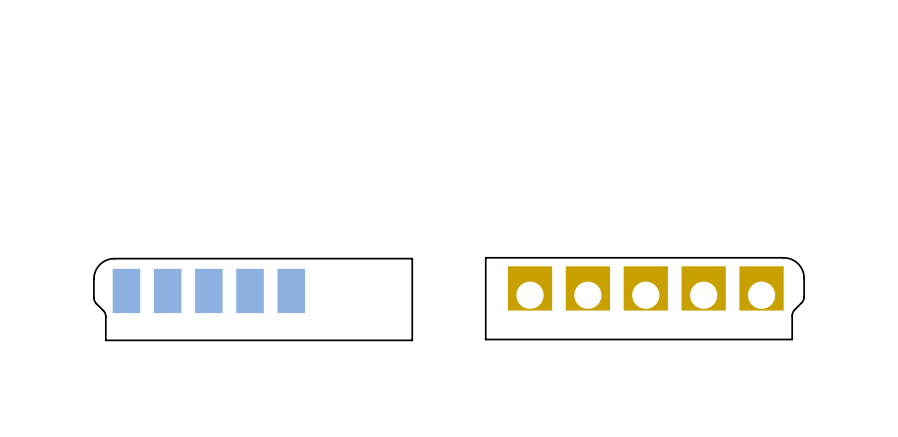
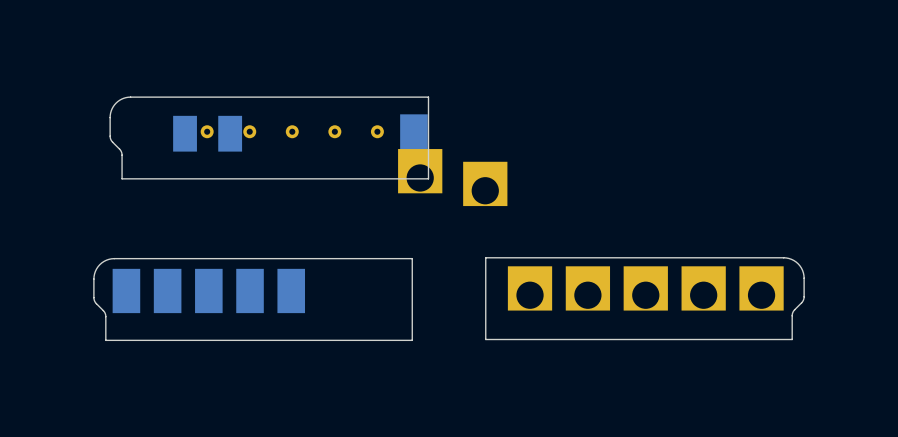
board edge: none -> (428, 97) (128, 97) (117, 101) (112, 108) (110, 137) (121, 152) (122, 178) (428, 178) (428, 97)
part: none -> (207, 131)
part: none -> (249, 131)
part: none -> (292, 131)
part: none -> (334, 131)
part: none -> (377, 131)
part: none -> (185, 133)
part: none -> (230, 133)
part: none -> (413, 136)
part: none -> (420, 171)
part: none -> (485, 183)

